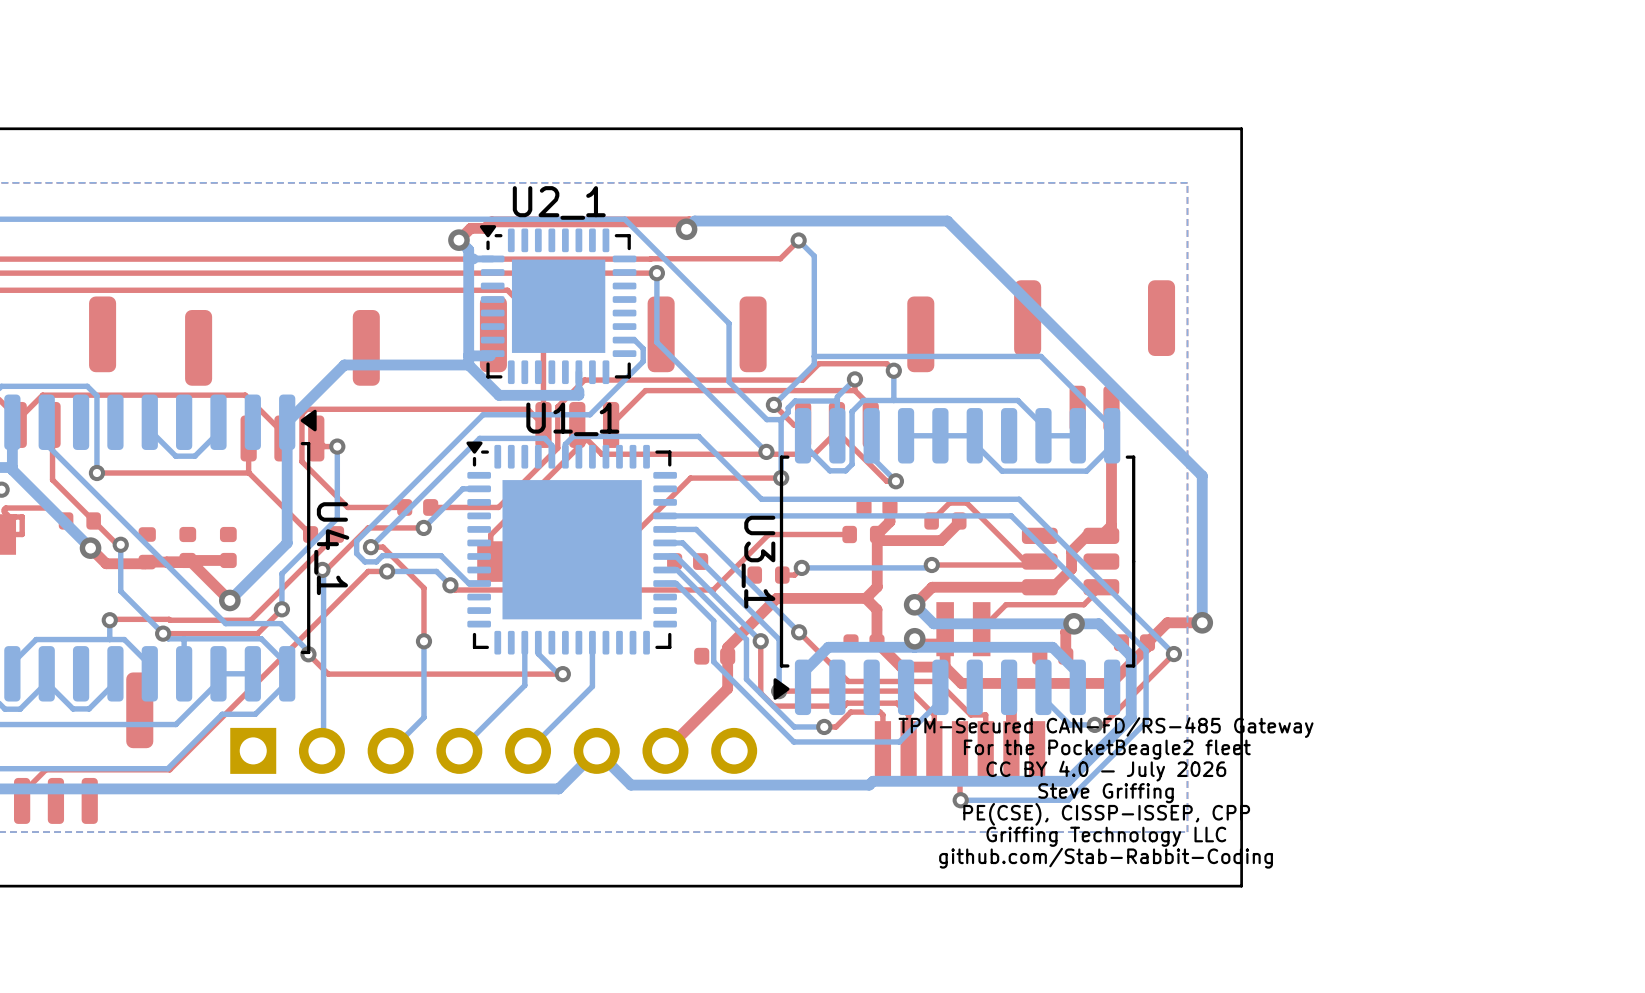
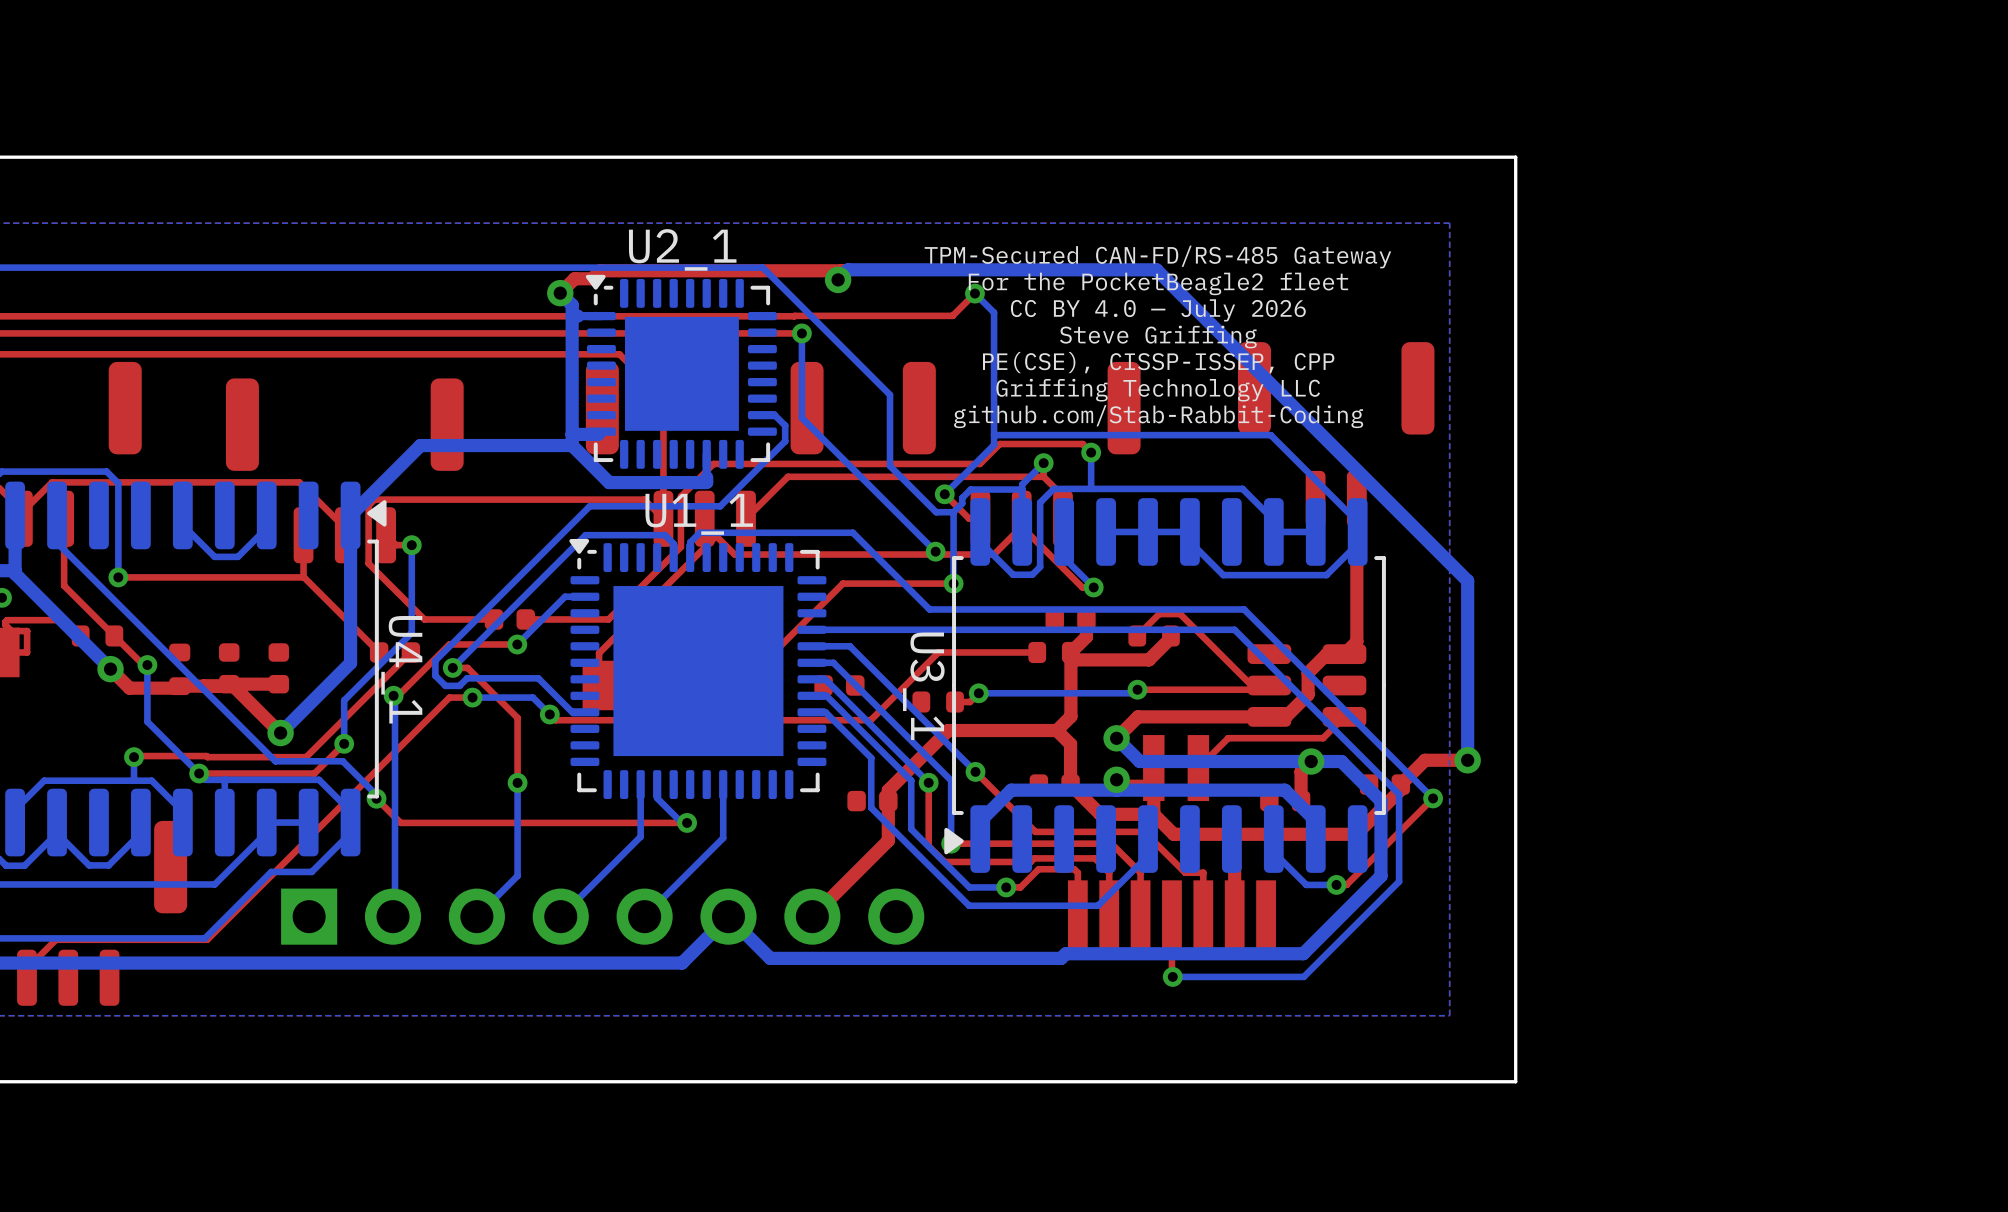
text position: TPM-Secured CAN-FD/RS-485 Gateway (1106, 727) -> TPM-Secured CAN-FD/RS-485 Gateway (1157, 256)
text position: For the PocketBeagle2 fleet (1107, 749) -> For the PocketBeagle2 fleet (1158, 283)
text position: CC BY 4.0 — July 2026 (1106, 771) -> CC BY 4.0 — July 2026 (1158, 310)
text position: Steve Griffing (1106, 793) -> Steve Griffing (1158, 337)
text position: PE(CSE), CISSP-ISSEP, CPP (1106, 814) -> PE(CSE), CISSP-ISSEP, CPP (1158, 362)
text position: Griffing Technology LLC (1106, 836) -> Griffing Technology LLC (1158, 390)
text position: github.com/Stab-Rabbit-Coding (1106, 858) -> github.com/Stab-Rabbit-Coding (1158, 416)

